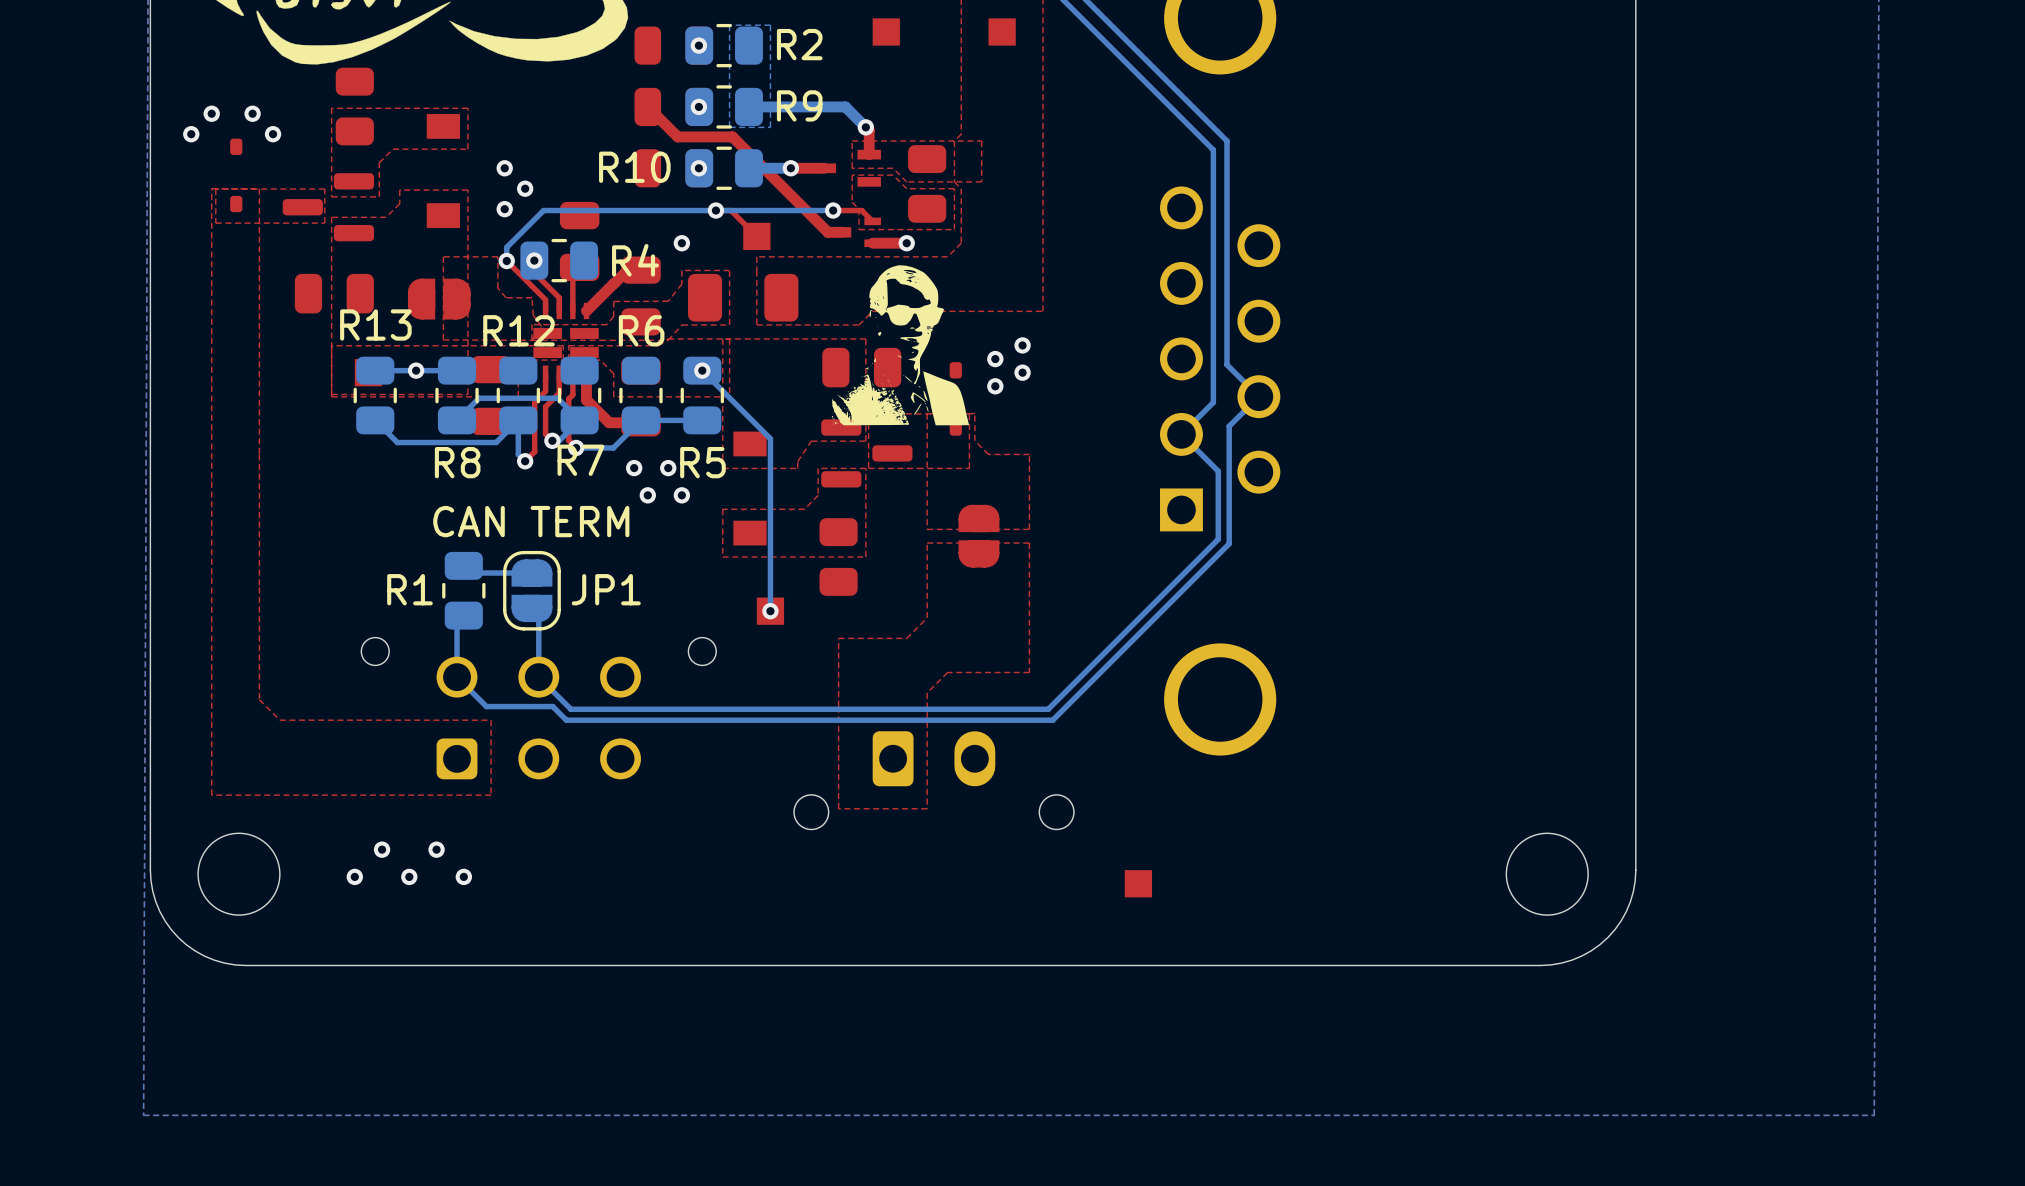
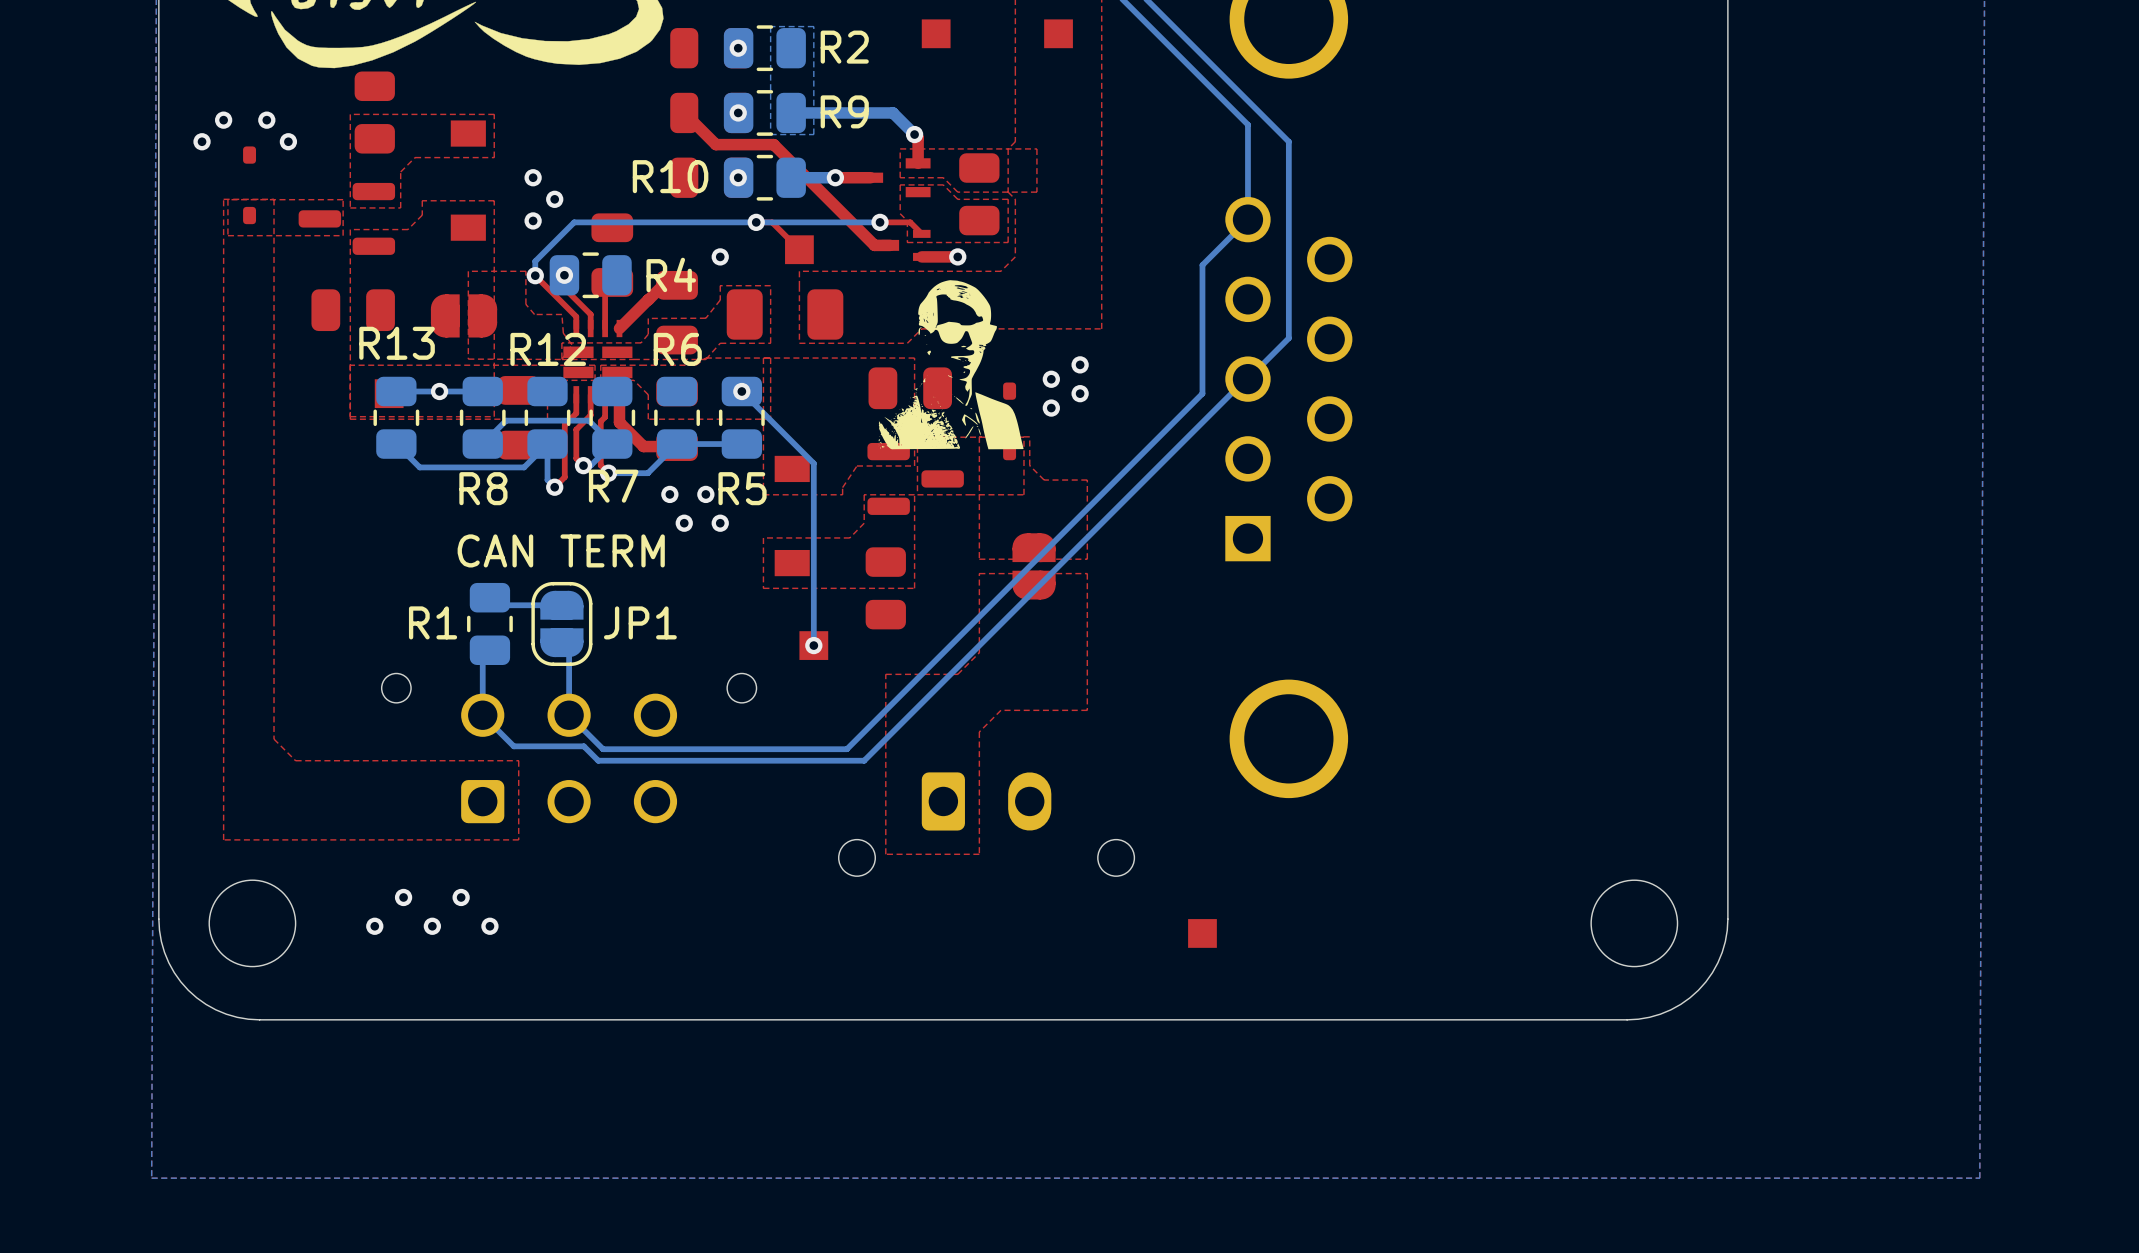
bottom track: (1181, 118) (1213, 150) (1213, 402) (1181, 434) (1218, 471) (1218, 539) (1048, 709) (801, 709) -> (1247, 124) (1247, 219) (1202, 265) (1202, 393) (846, 749)
bottom track: (1220, 134) (1226, 141) (1226, 364) (1258, 396) (1229, 426) (1229, 543) (1052, 720) (818, 720) -> (1245, 379) (864, 760)
bottom track: none -> (1288, 141) (1288, 338) (1247, 379)

